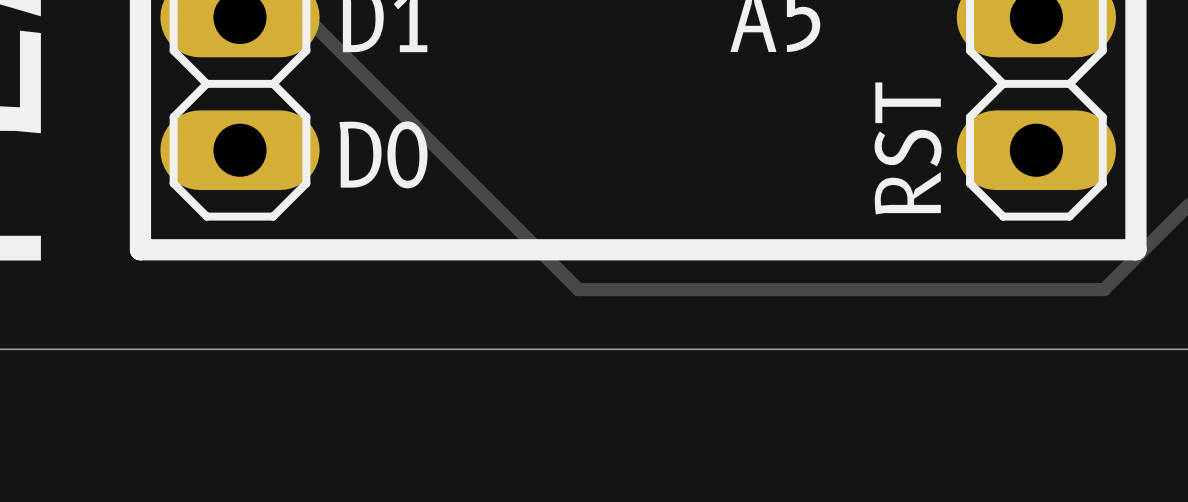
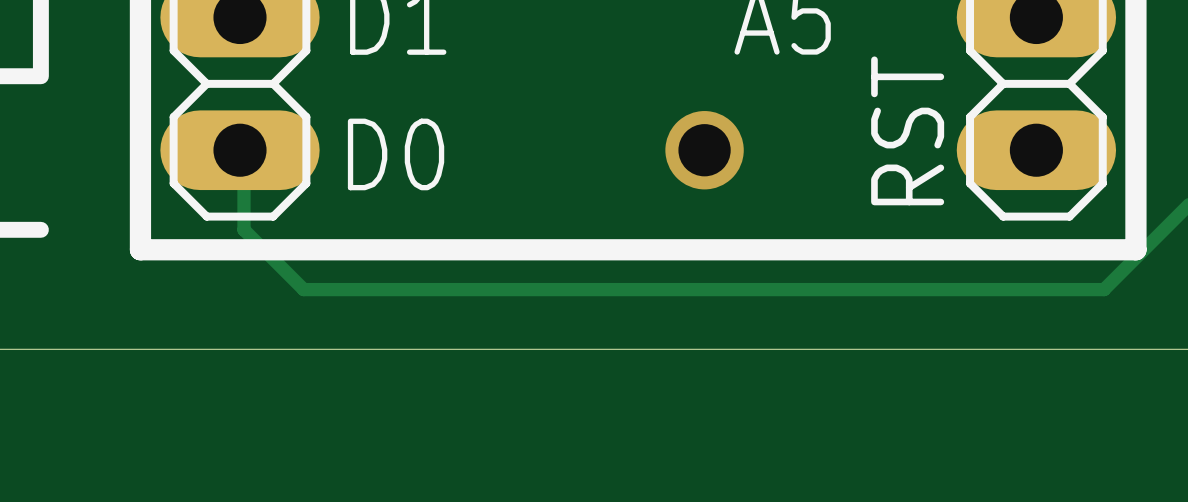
track: (240, 17) (243, 26) (315, 26) (578, 289) -> (240, 150) (243, 158) (243, 229) (303, 289) (578, 289)
via: none -> (704, 150)

